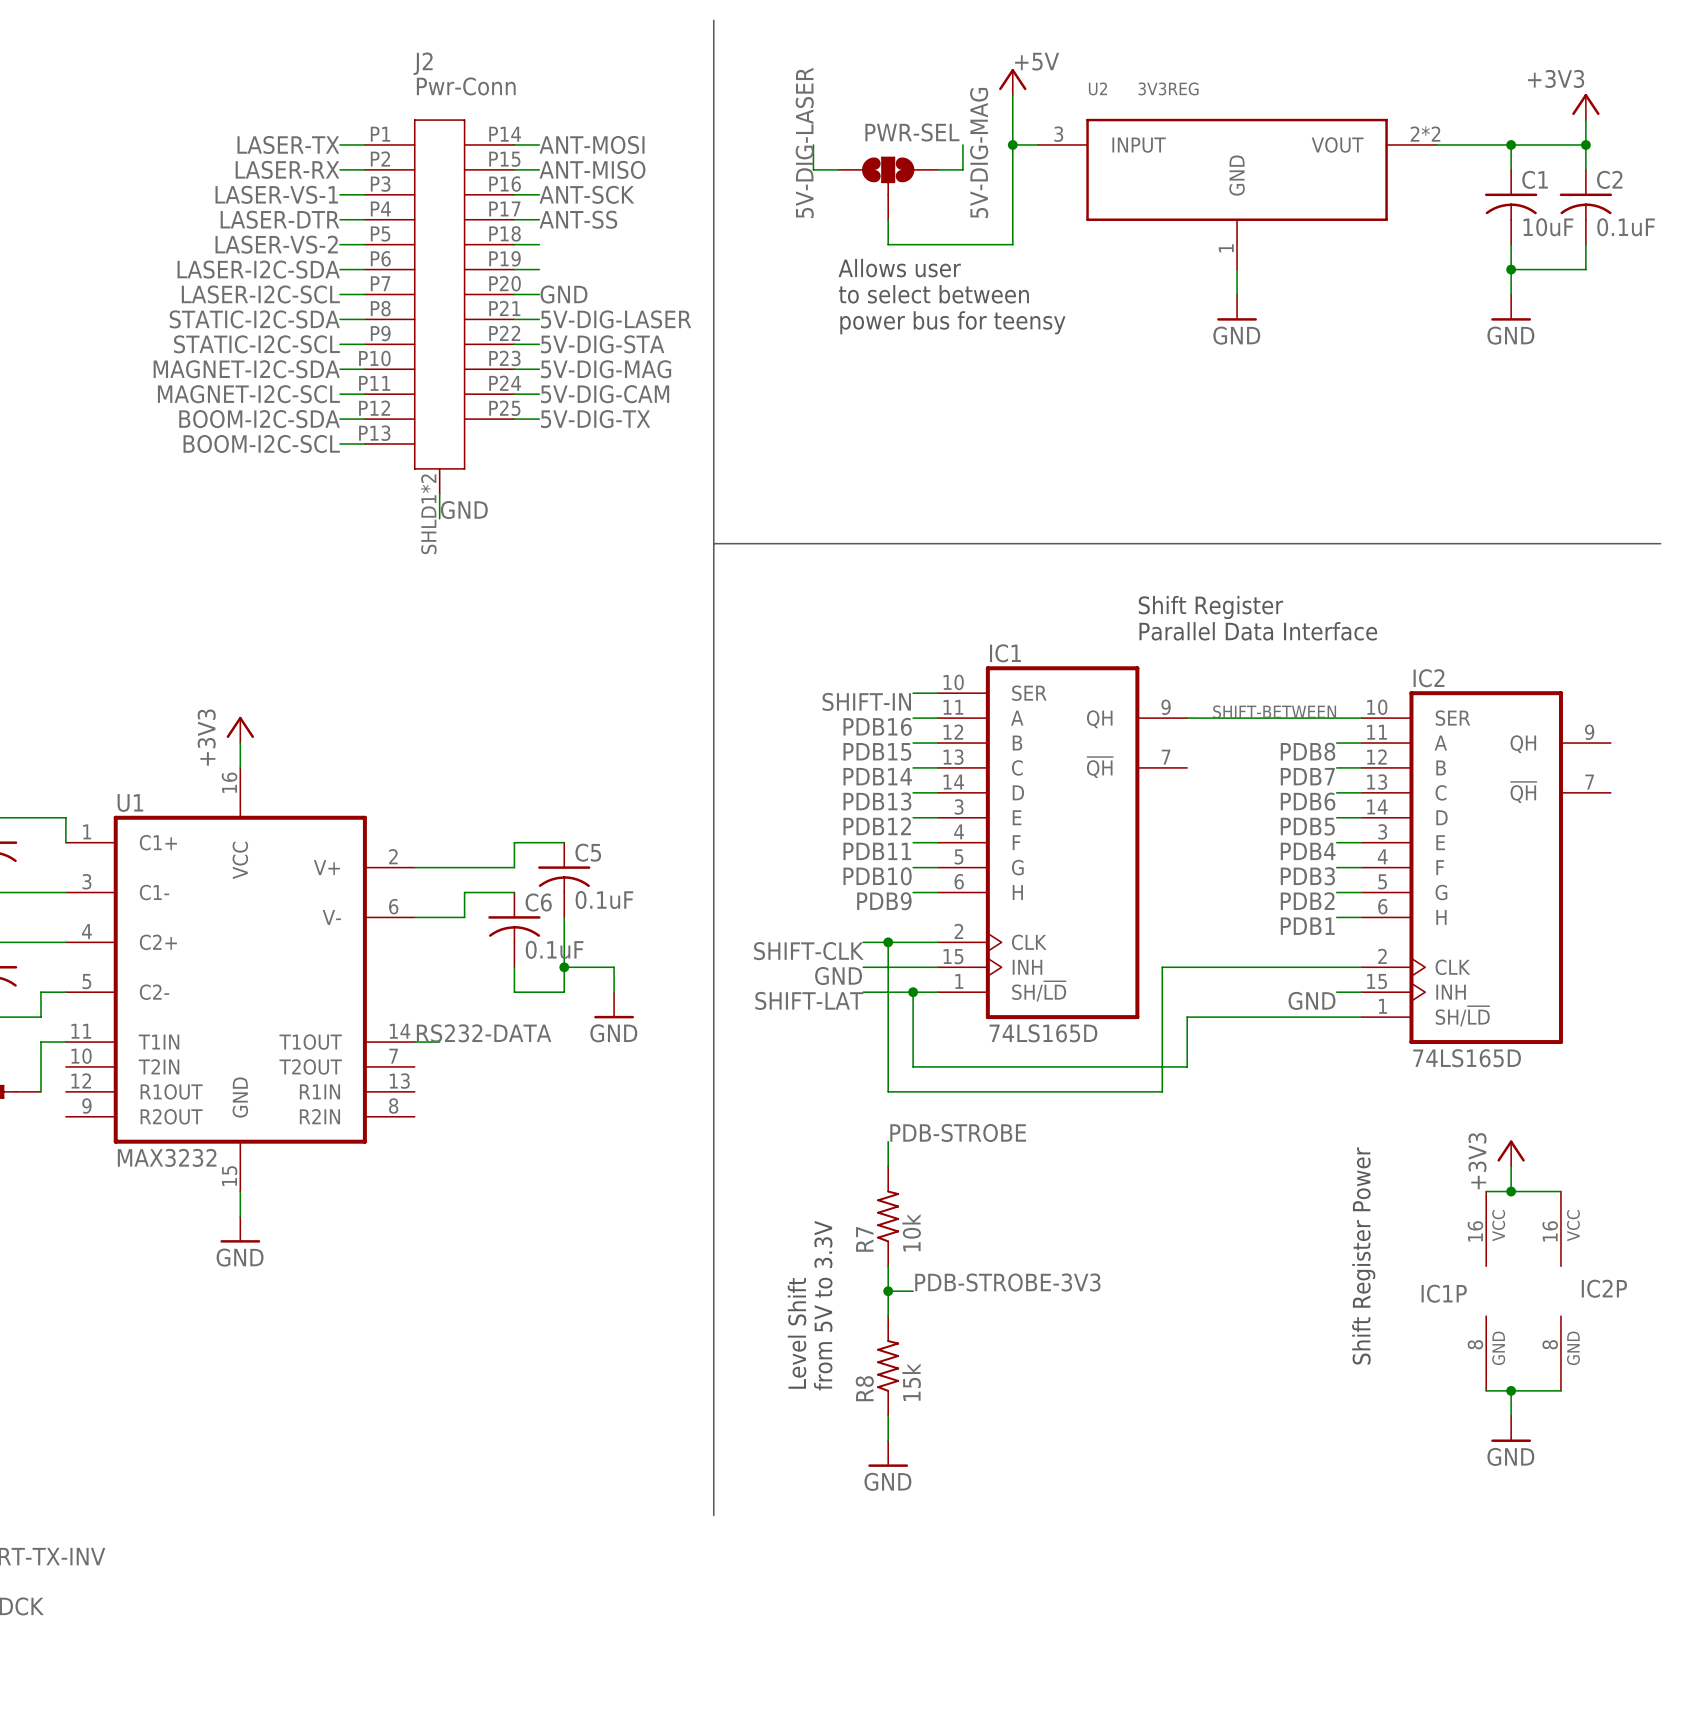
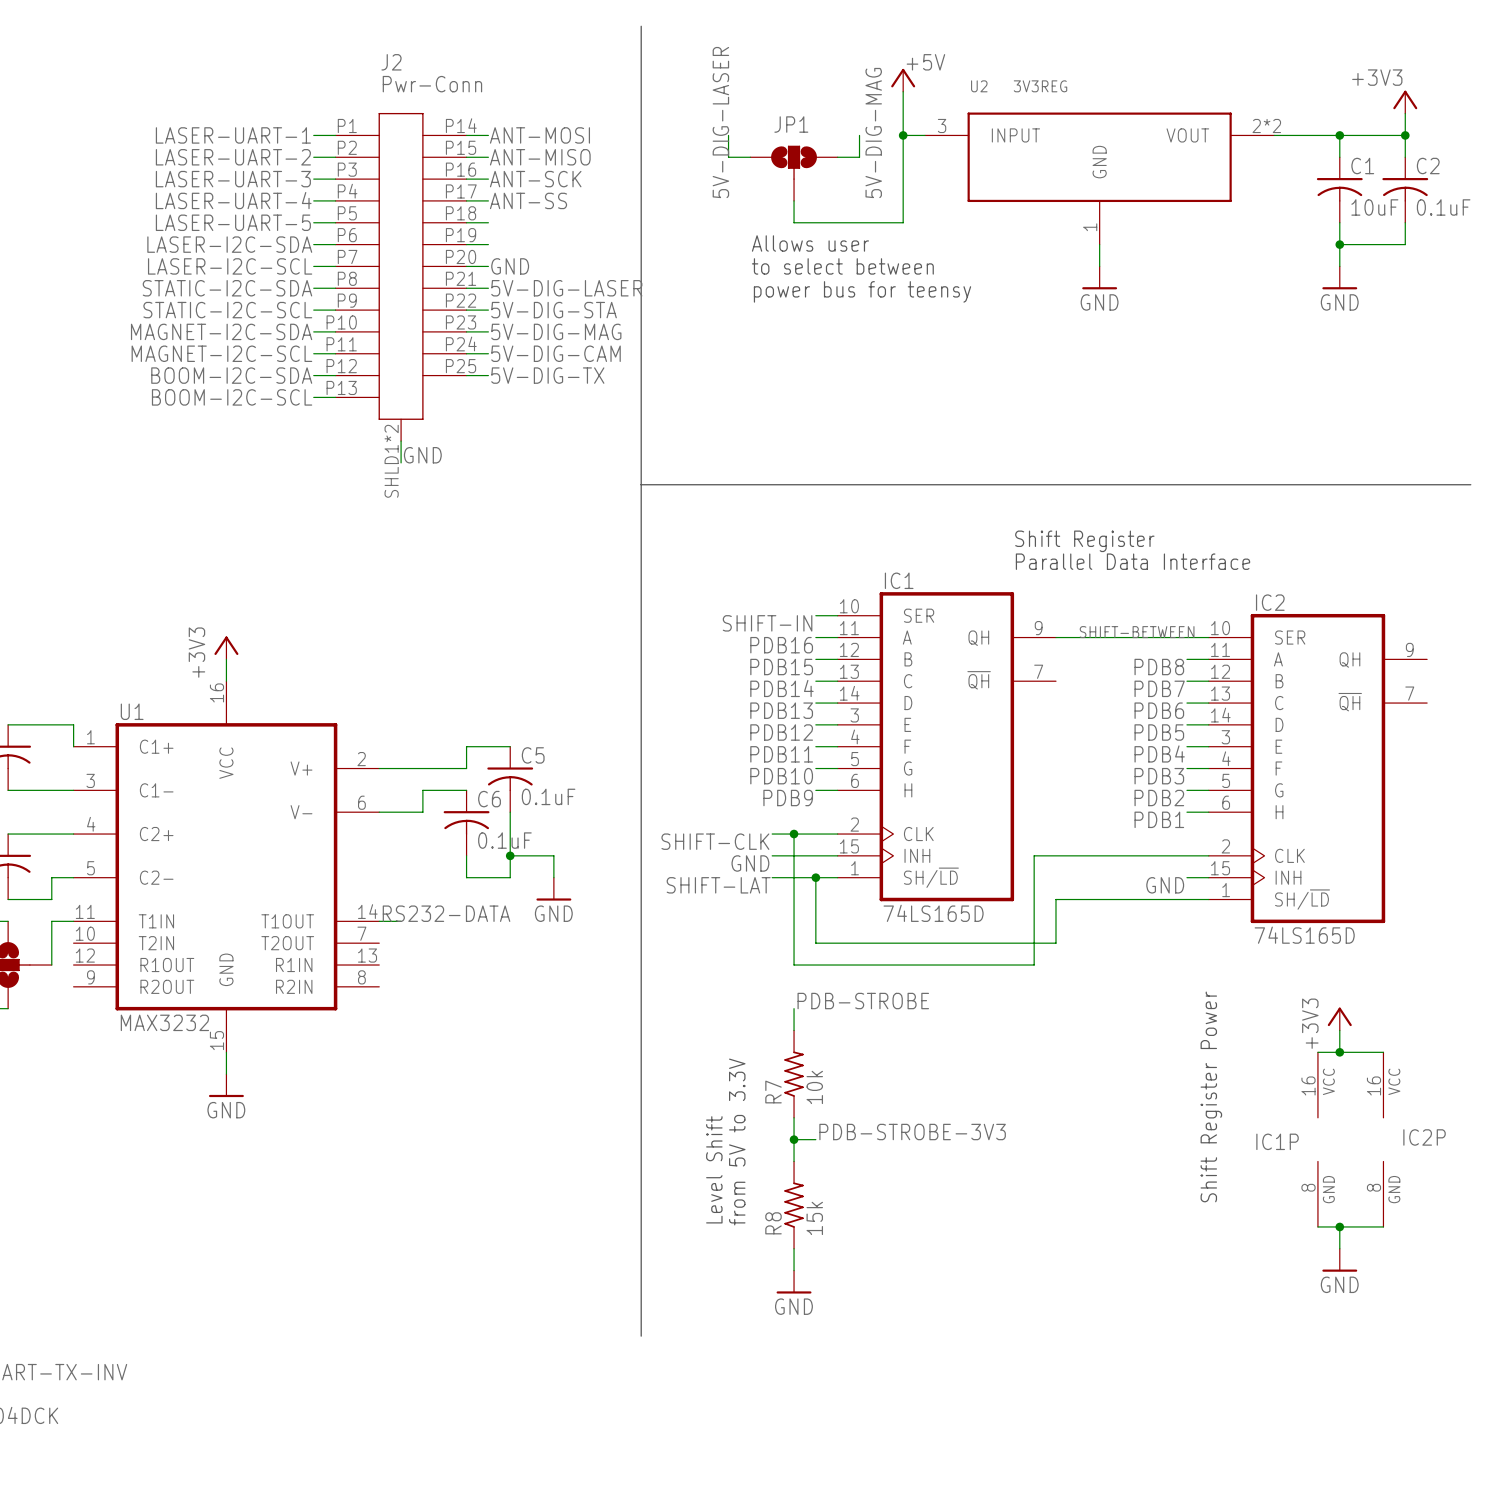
PWR-SEL name: PWR-SEL (912, 132) -> JP1 (791, 124)
label: LASER-TX (288, 144) -> LASER-UART-1 (233, 135)
label: LASER-RX (287, 169) -> LASER-UART-2 (233, 157)
label: LASER-VS-1 (276, 194) -> LASER-UART-3 (233, 179)
label: LASER-DTR (280, 219) -> LASER-UART-4 (233, 200)
label: LASER-VS-2 (276, 244) -> LASER-UART-5 (233, 222)

